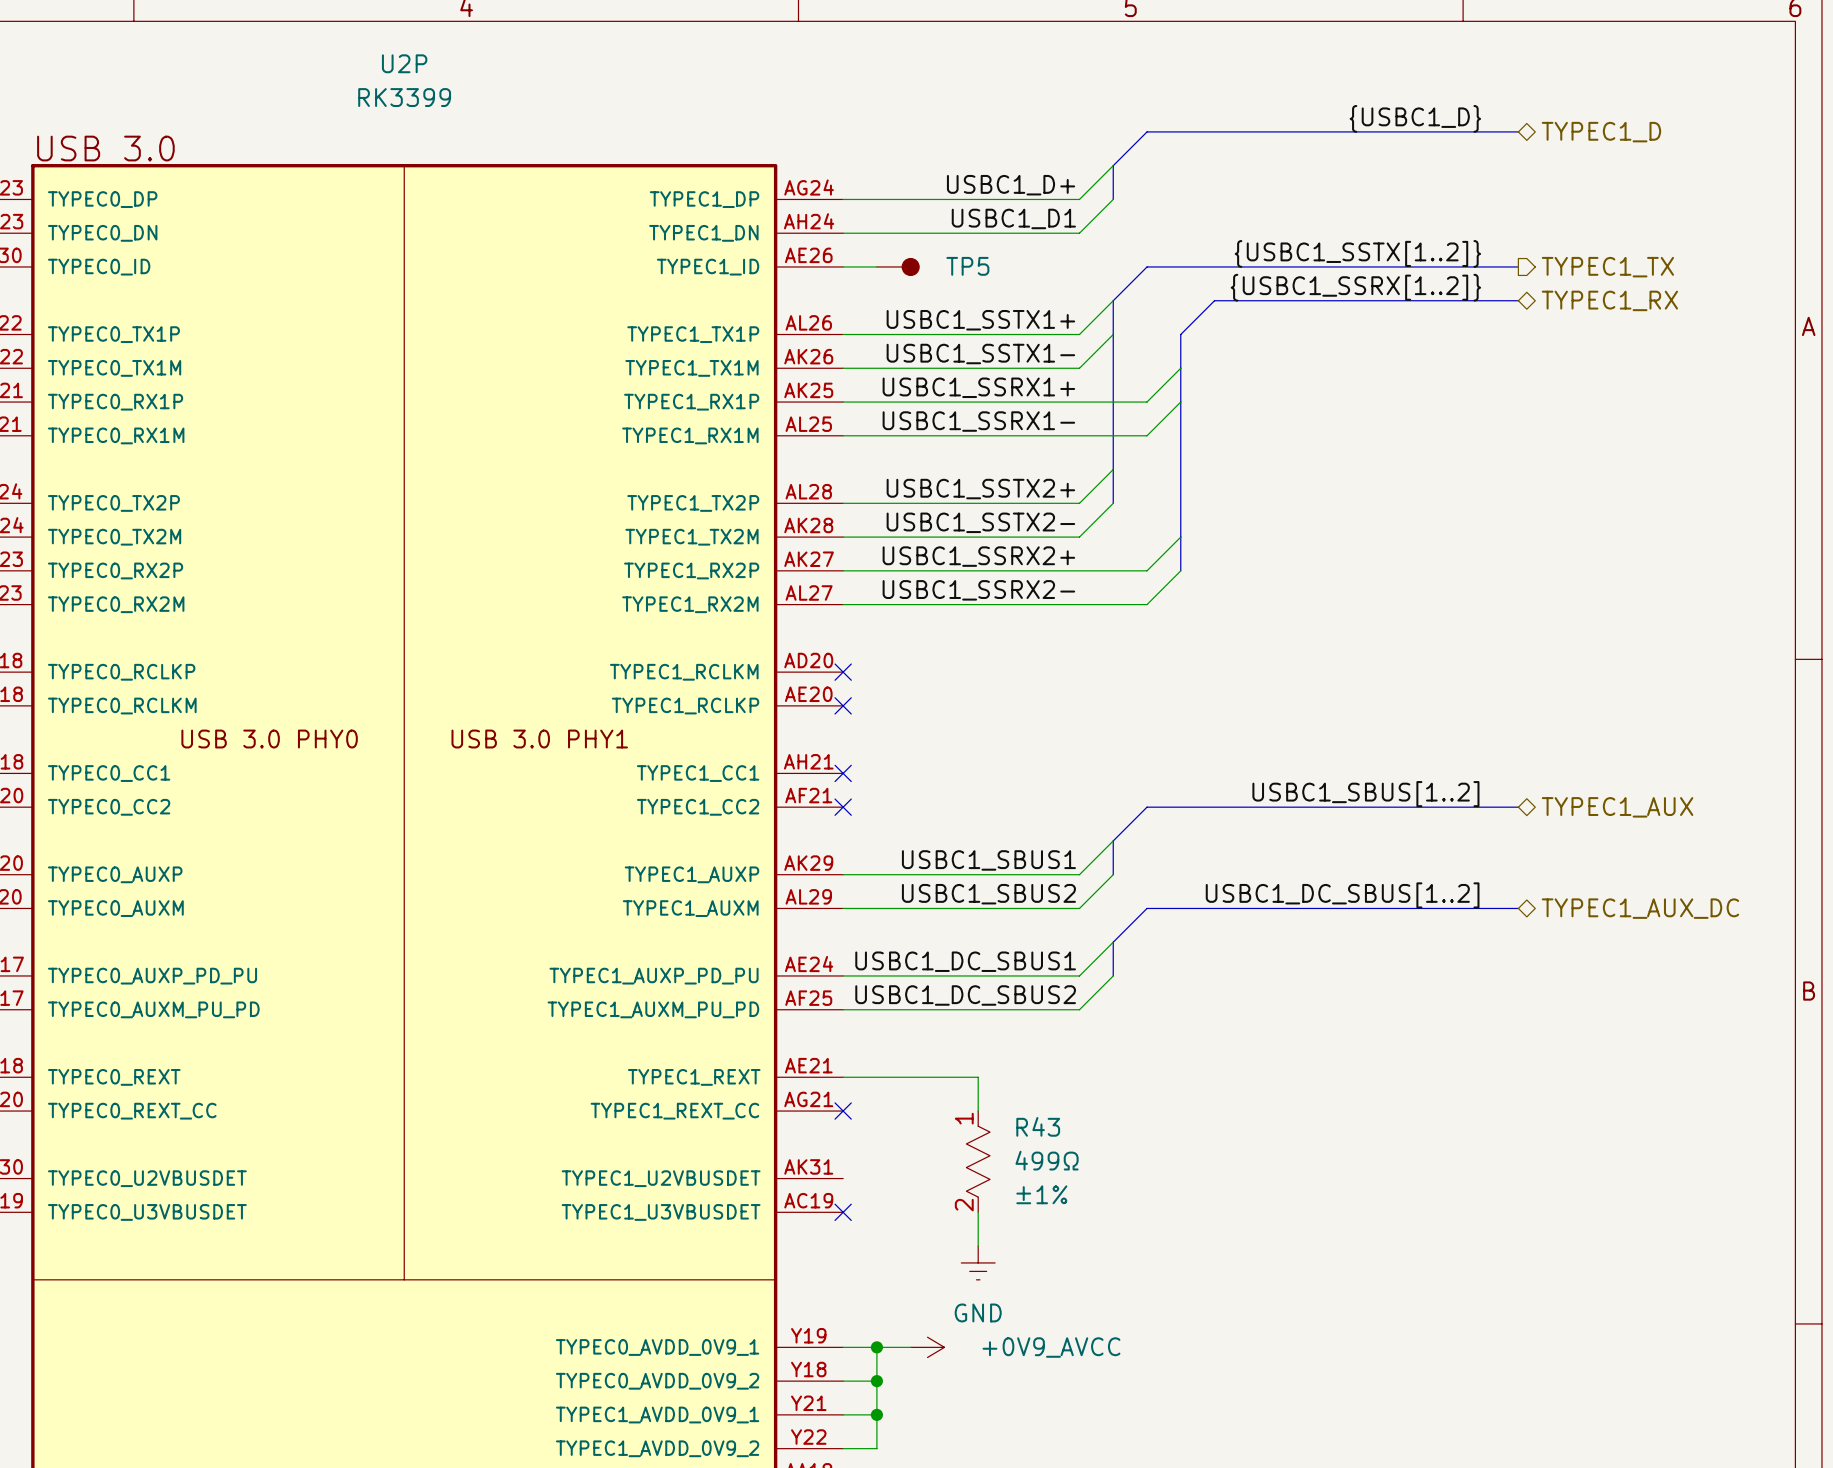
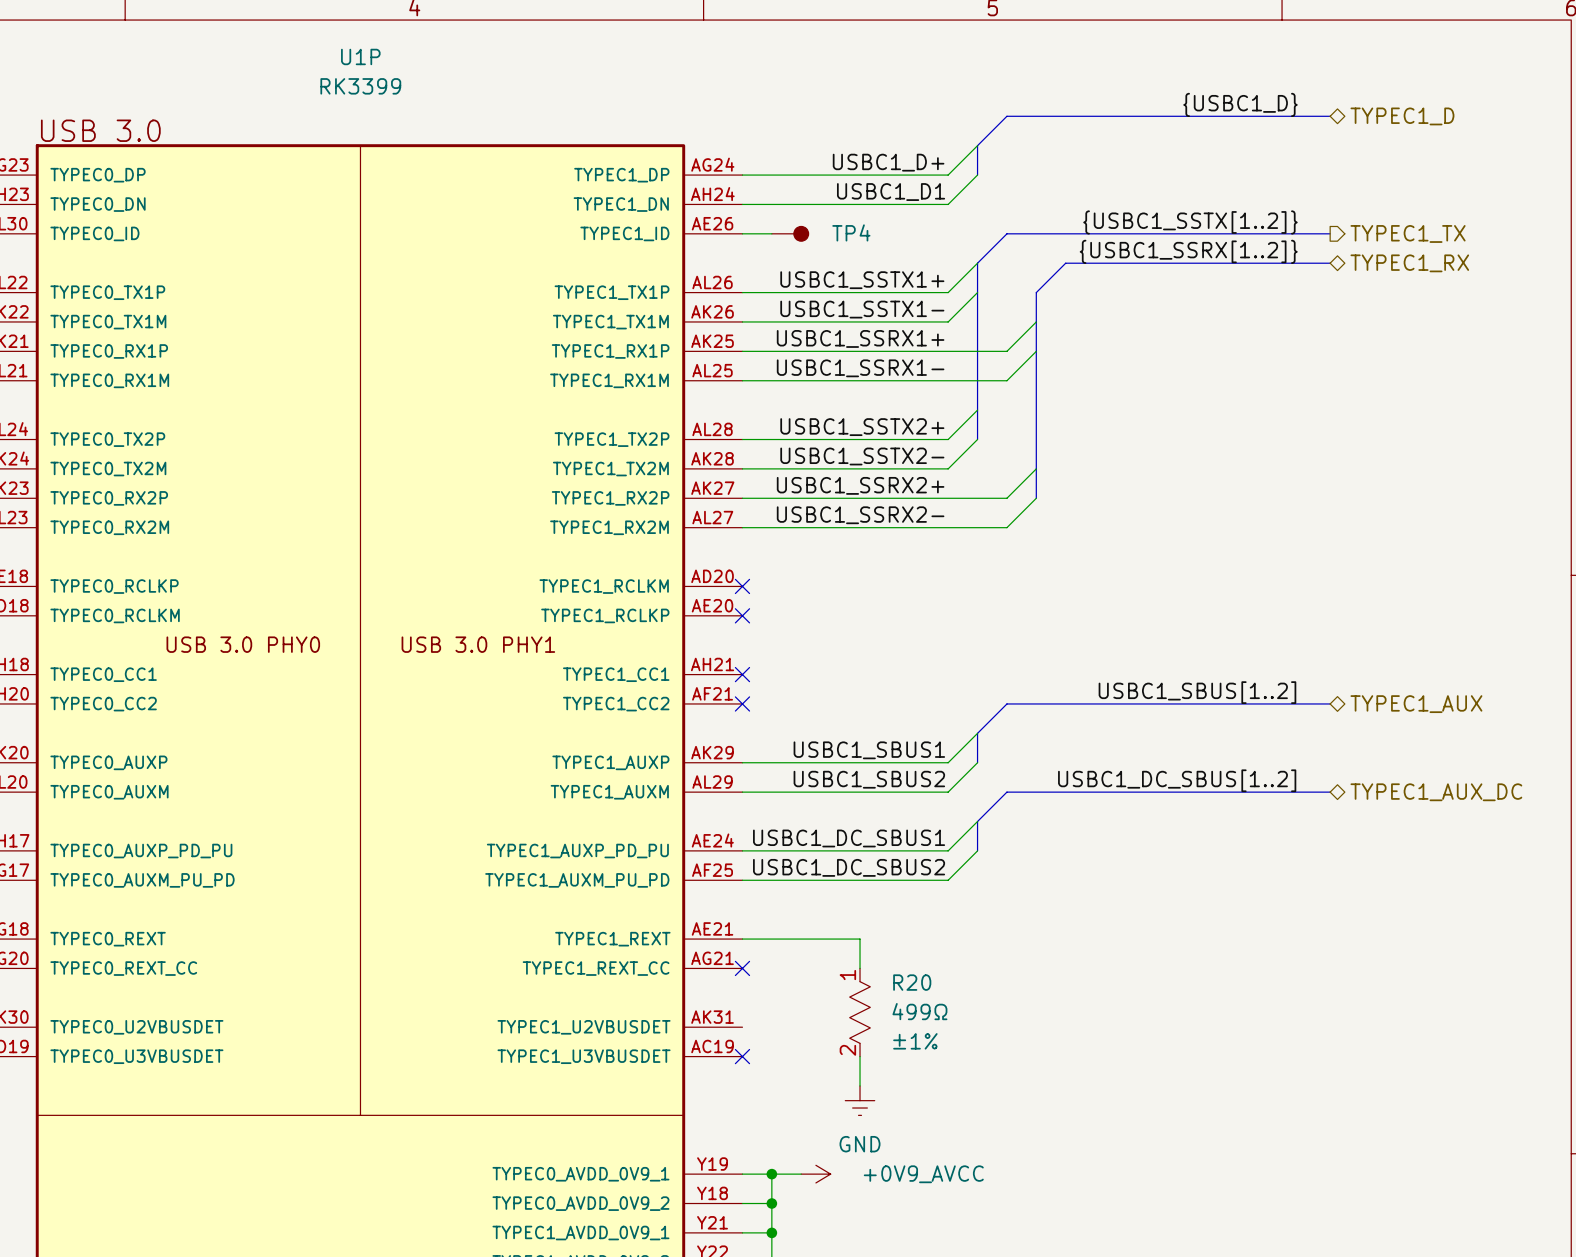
U2P name: U2P (404, 63) -> U1P (360, 56)
TP5 name: TP5 (967, 266) -> TP4 (851, 232)
R43 name: R43 (1038, 1126) -> R20 (912, 982)

